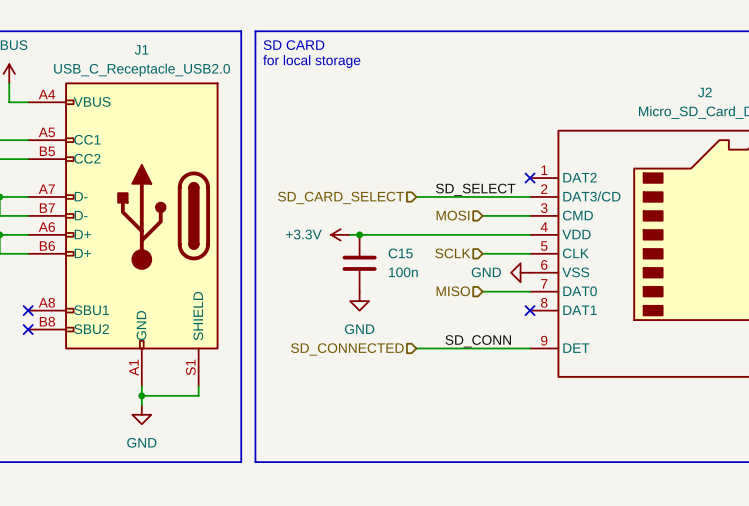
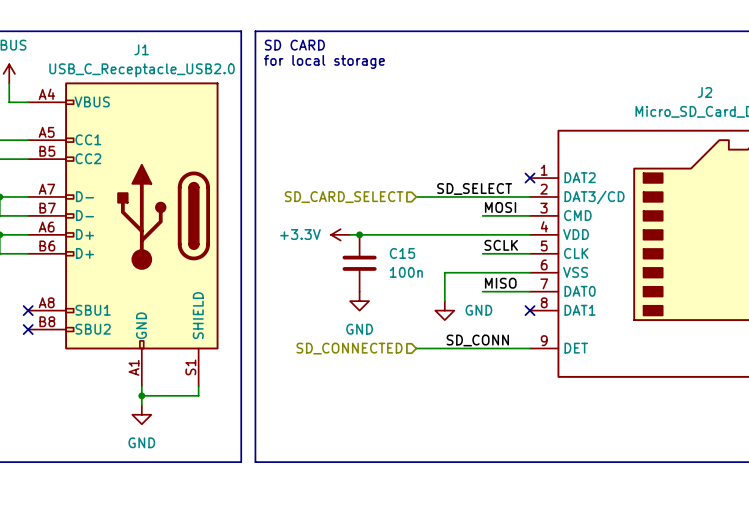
label: none -> MOSI (500, 207)
hierarchical label: MOSI (453, 215) -> none
label: none -> SCLK (501, 245)
hierarchical label: SCLK (452, 253) -> none
power symbol text position: GND (486, 272) -> GND (478, 310)
power symbol rotation: 0° (520, 272) -> 90° counterclockwise (444, 310)
power symbol position: GND (520, 272) -> GND (444, 310)
wire: none -> (530, 272) (444, 272) (444, 301)
label: none -> MISO (500, 283)
hierarchical label: MISO (453, 291) -> none

